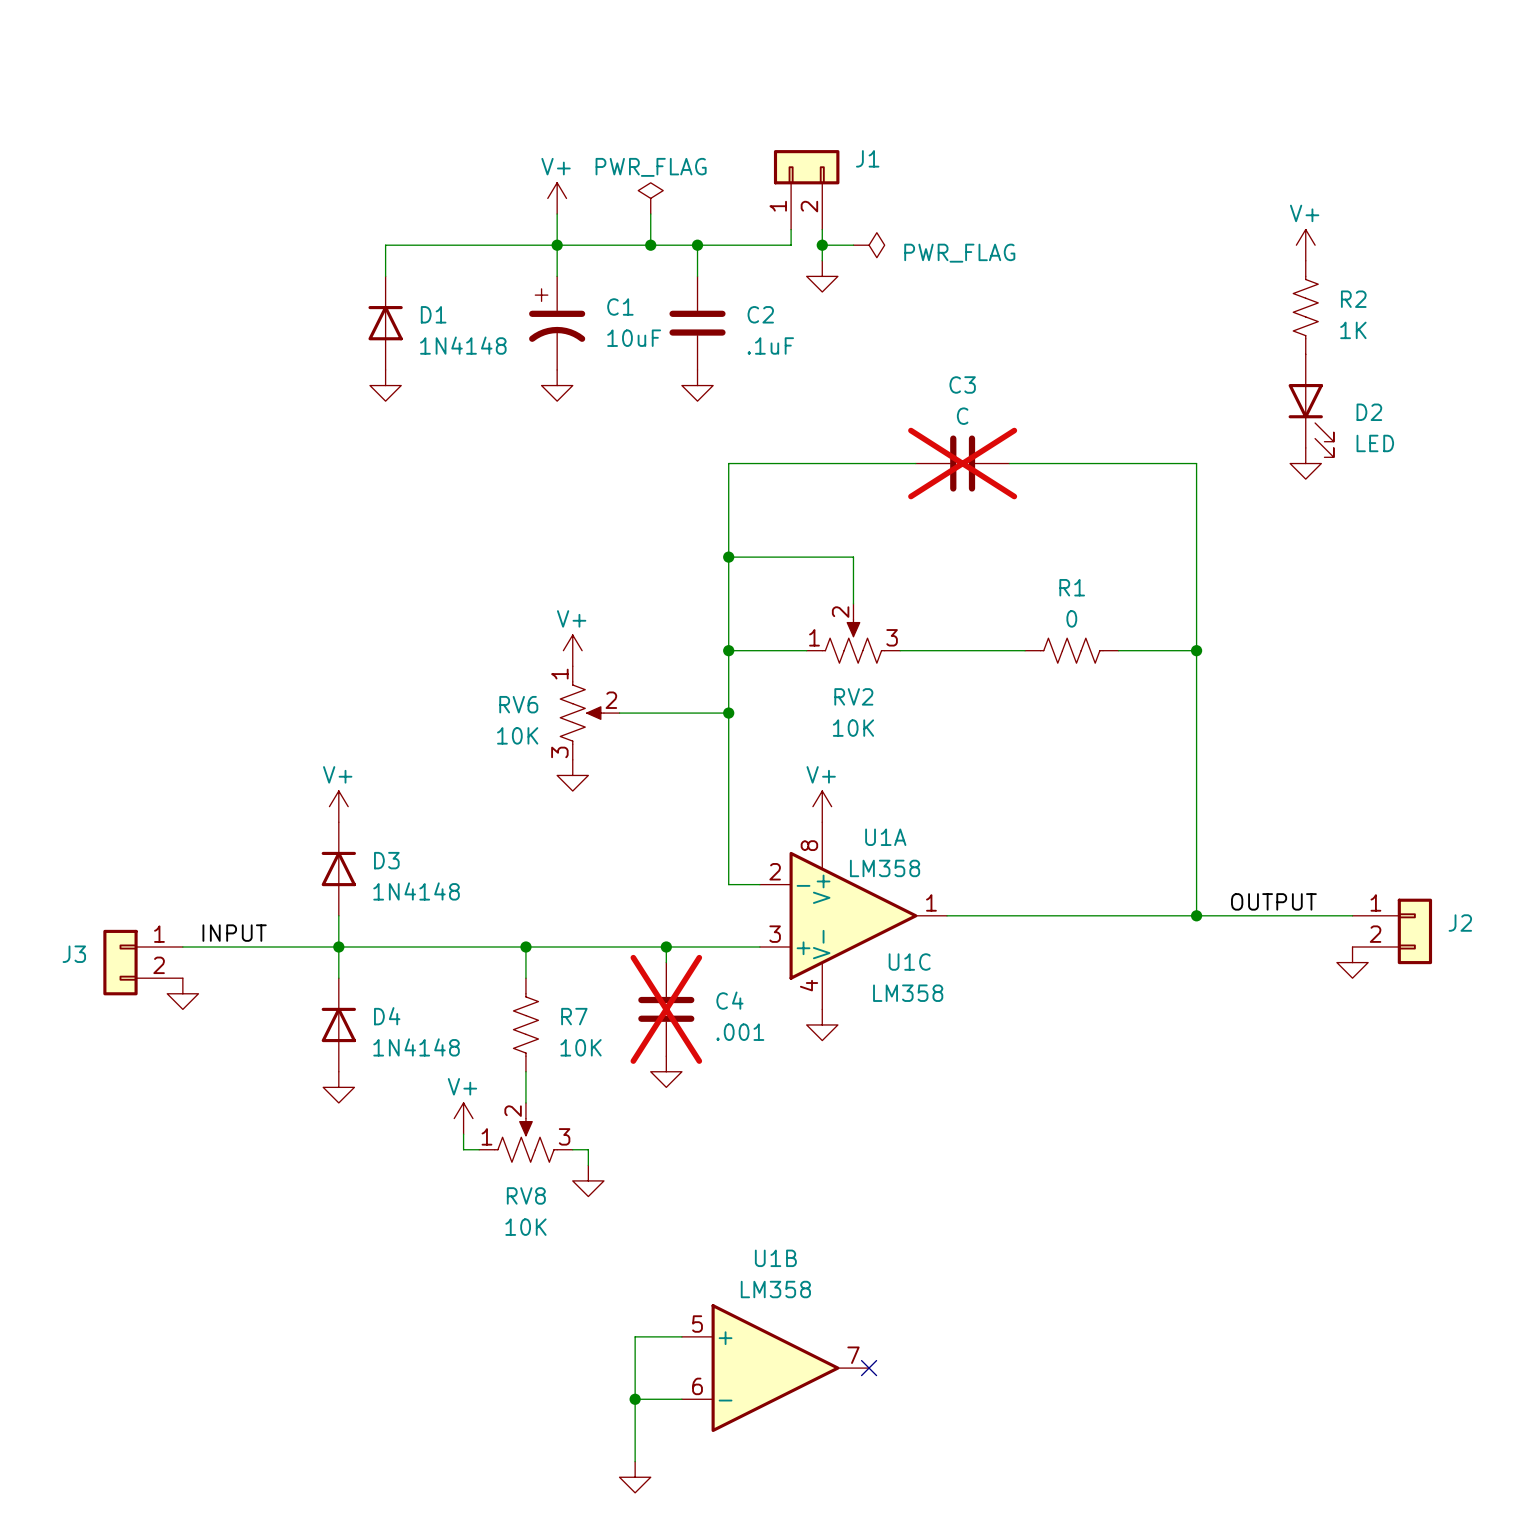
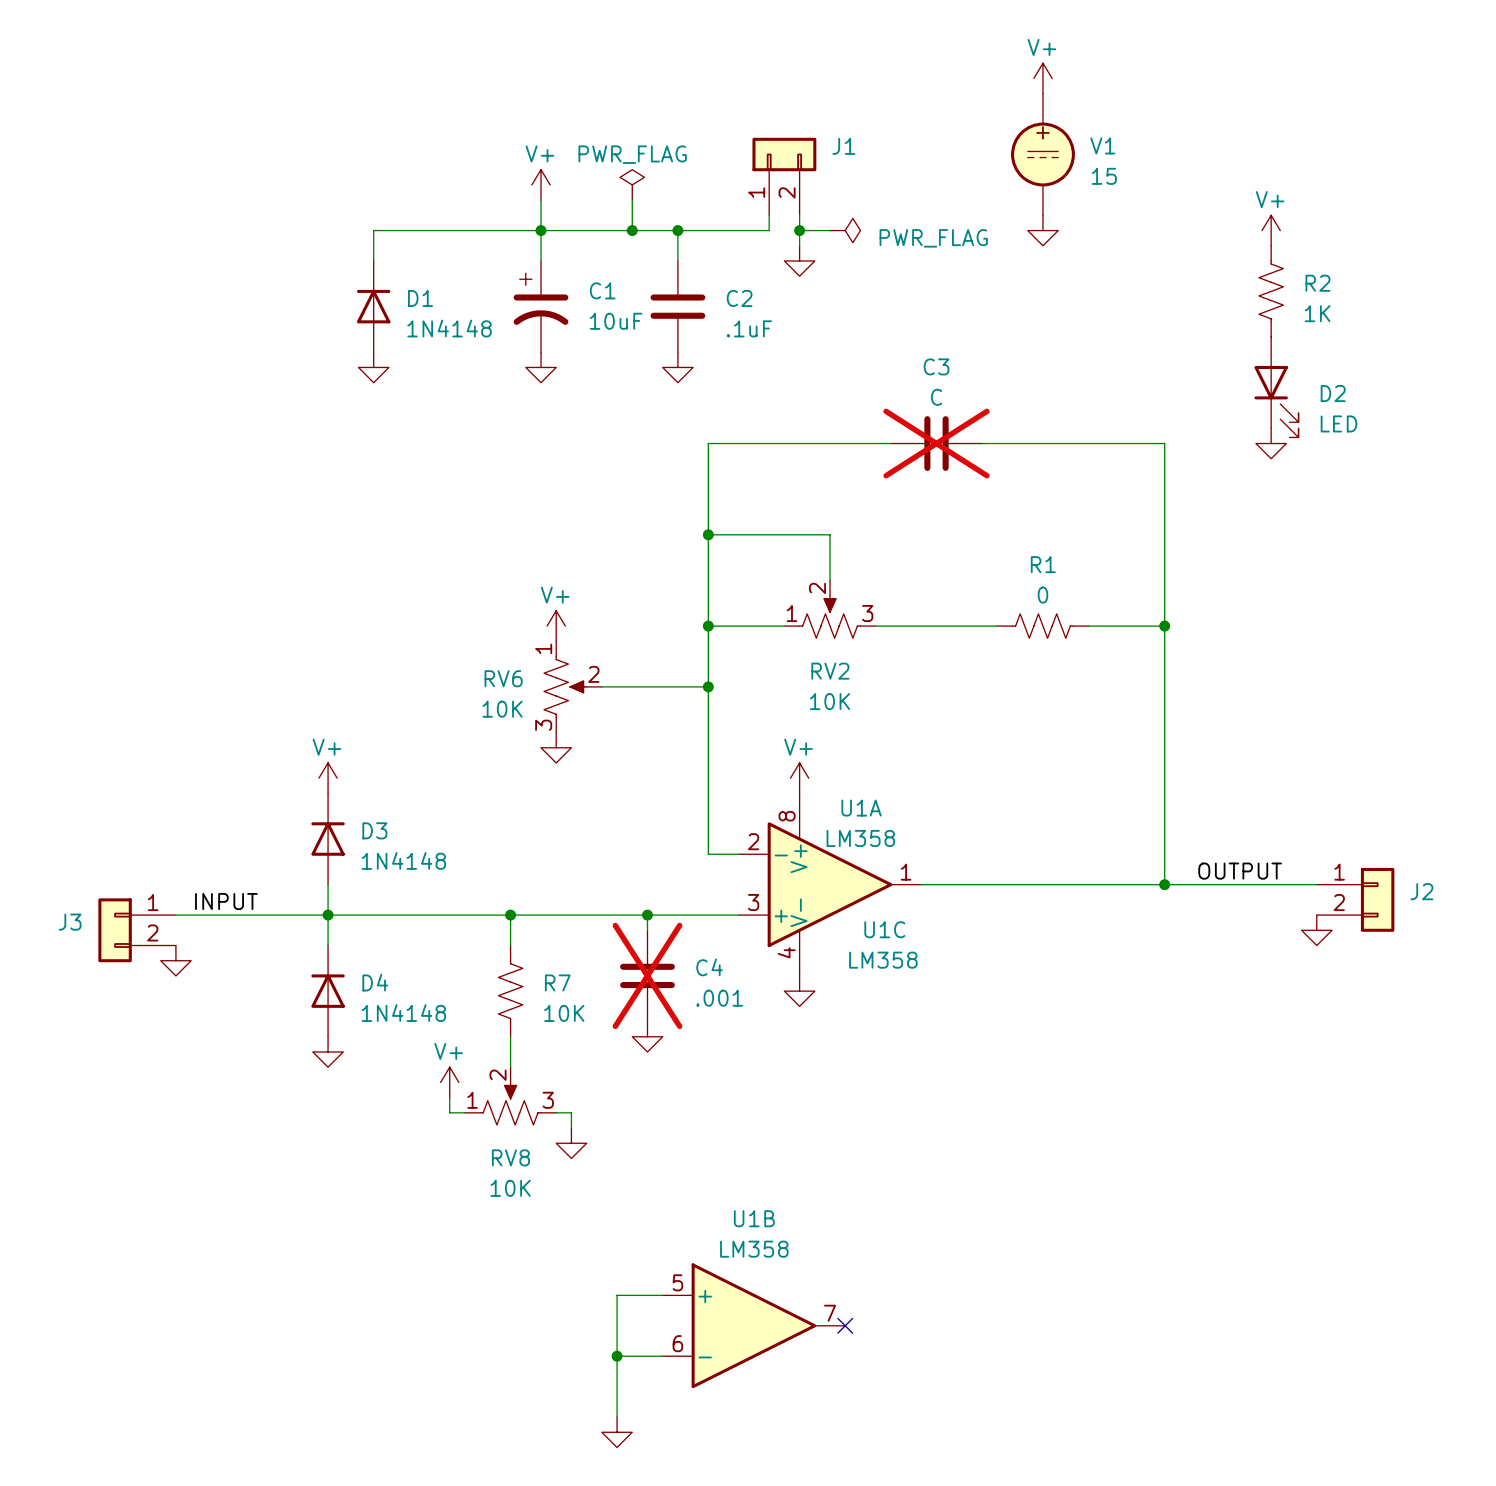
power symbol: none -> V+ (1042, 78)
V1: none -> 15 (1042, 154)
power symbol: none -> (1042, 230)

